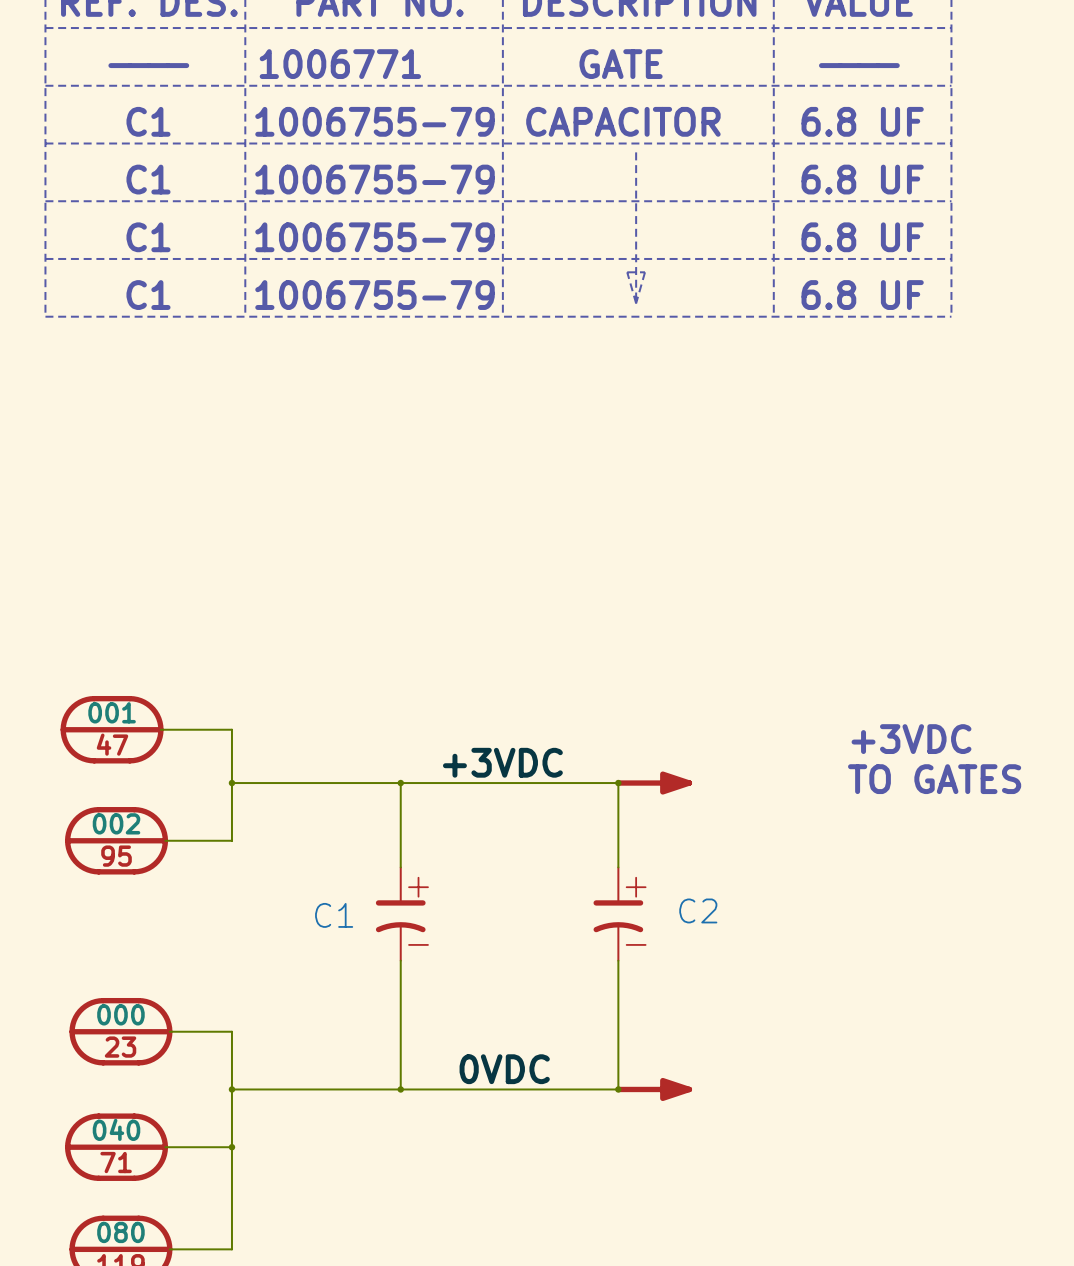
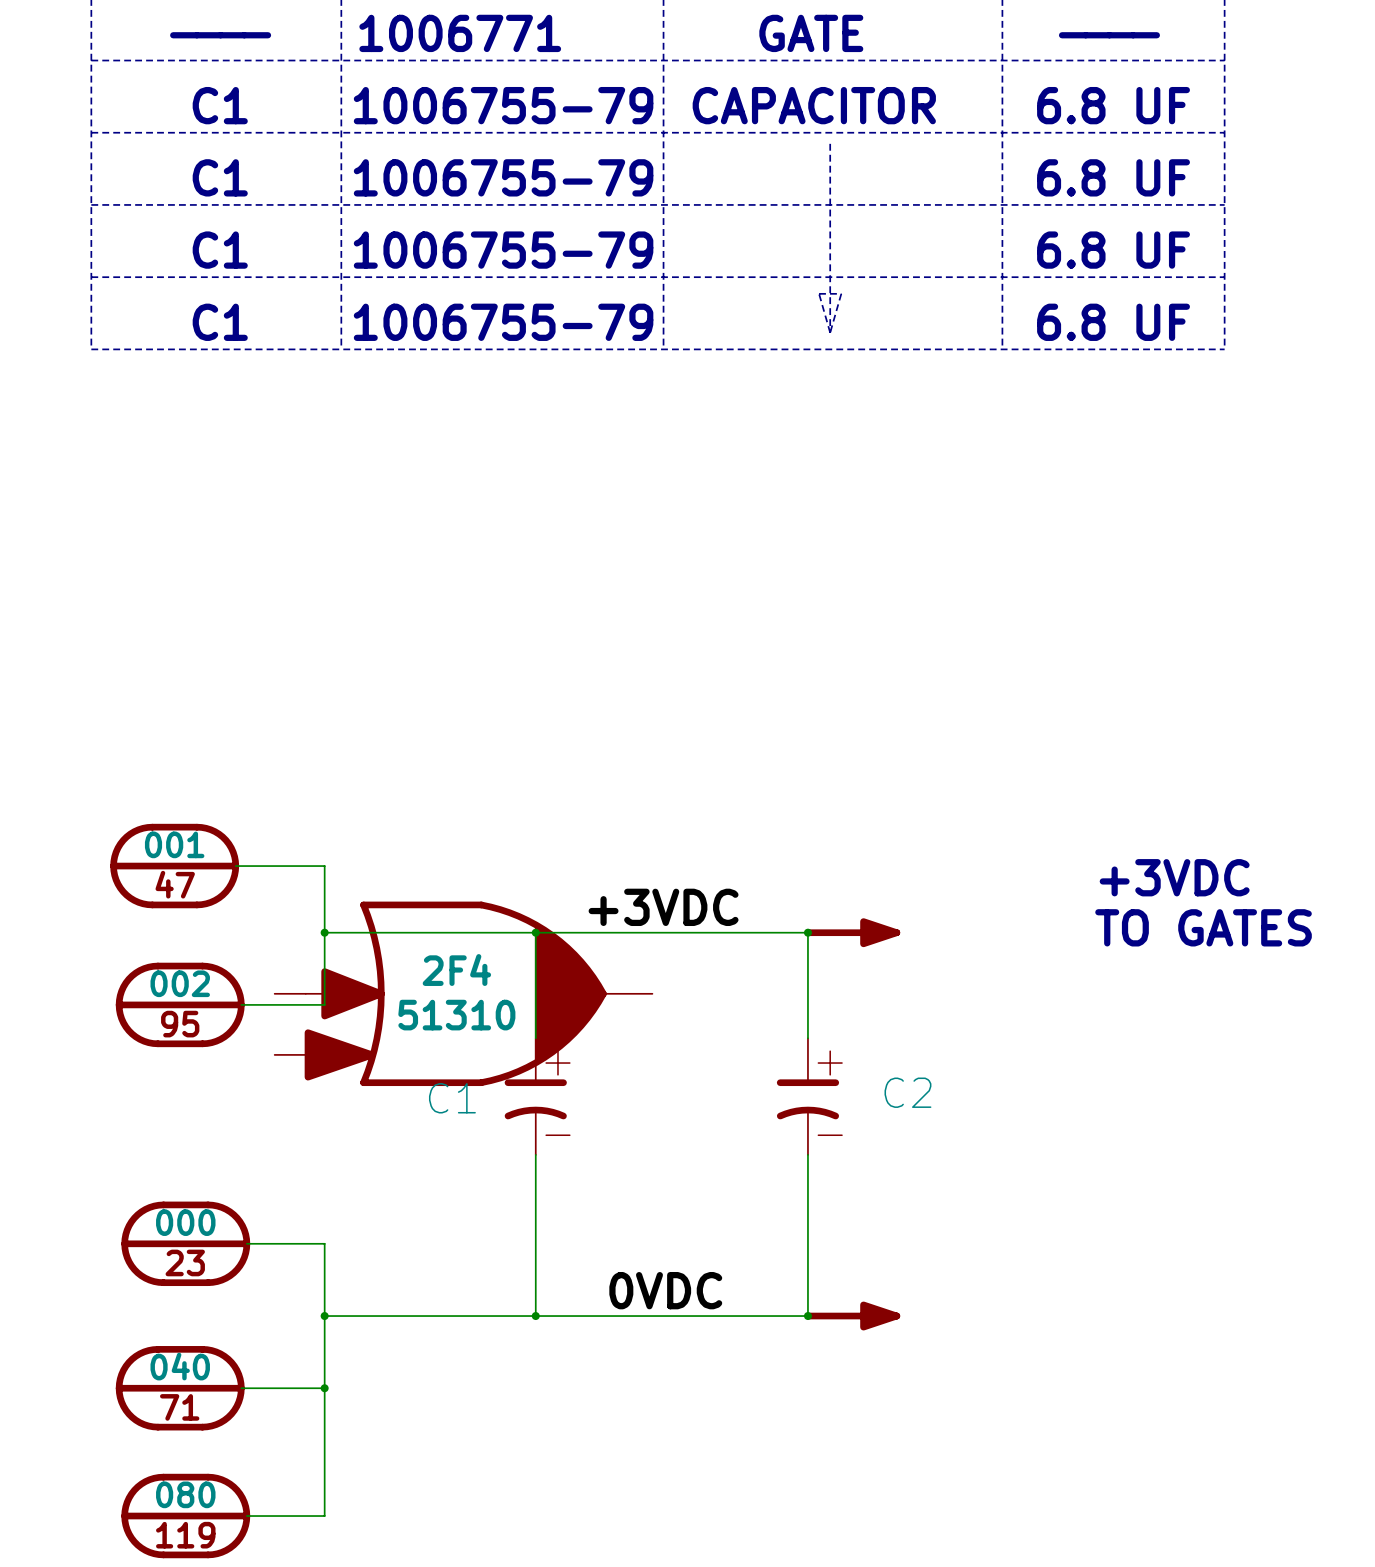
part: none -> (463, 993)

